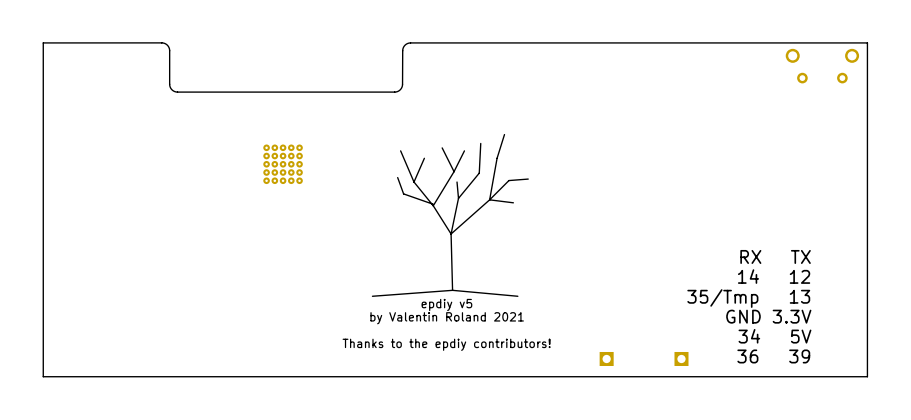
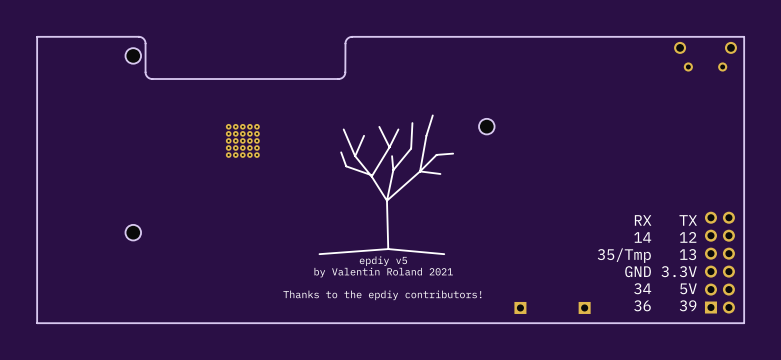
part: none -> (133, 55)
part: none -> (486, 126)
part: none -> (133, 232)
part: none -> (719, 262)

